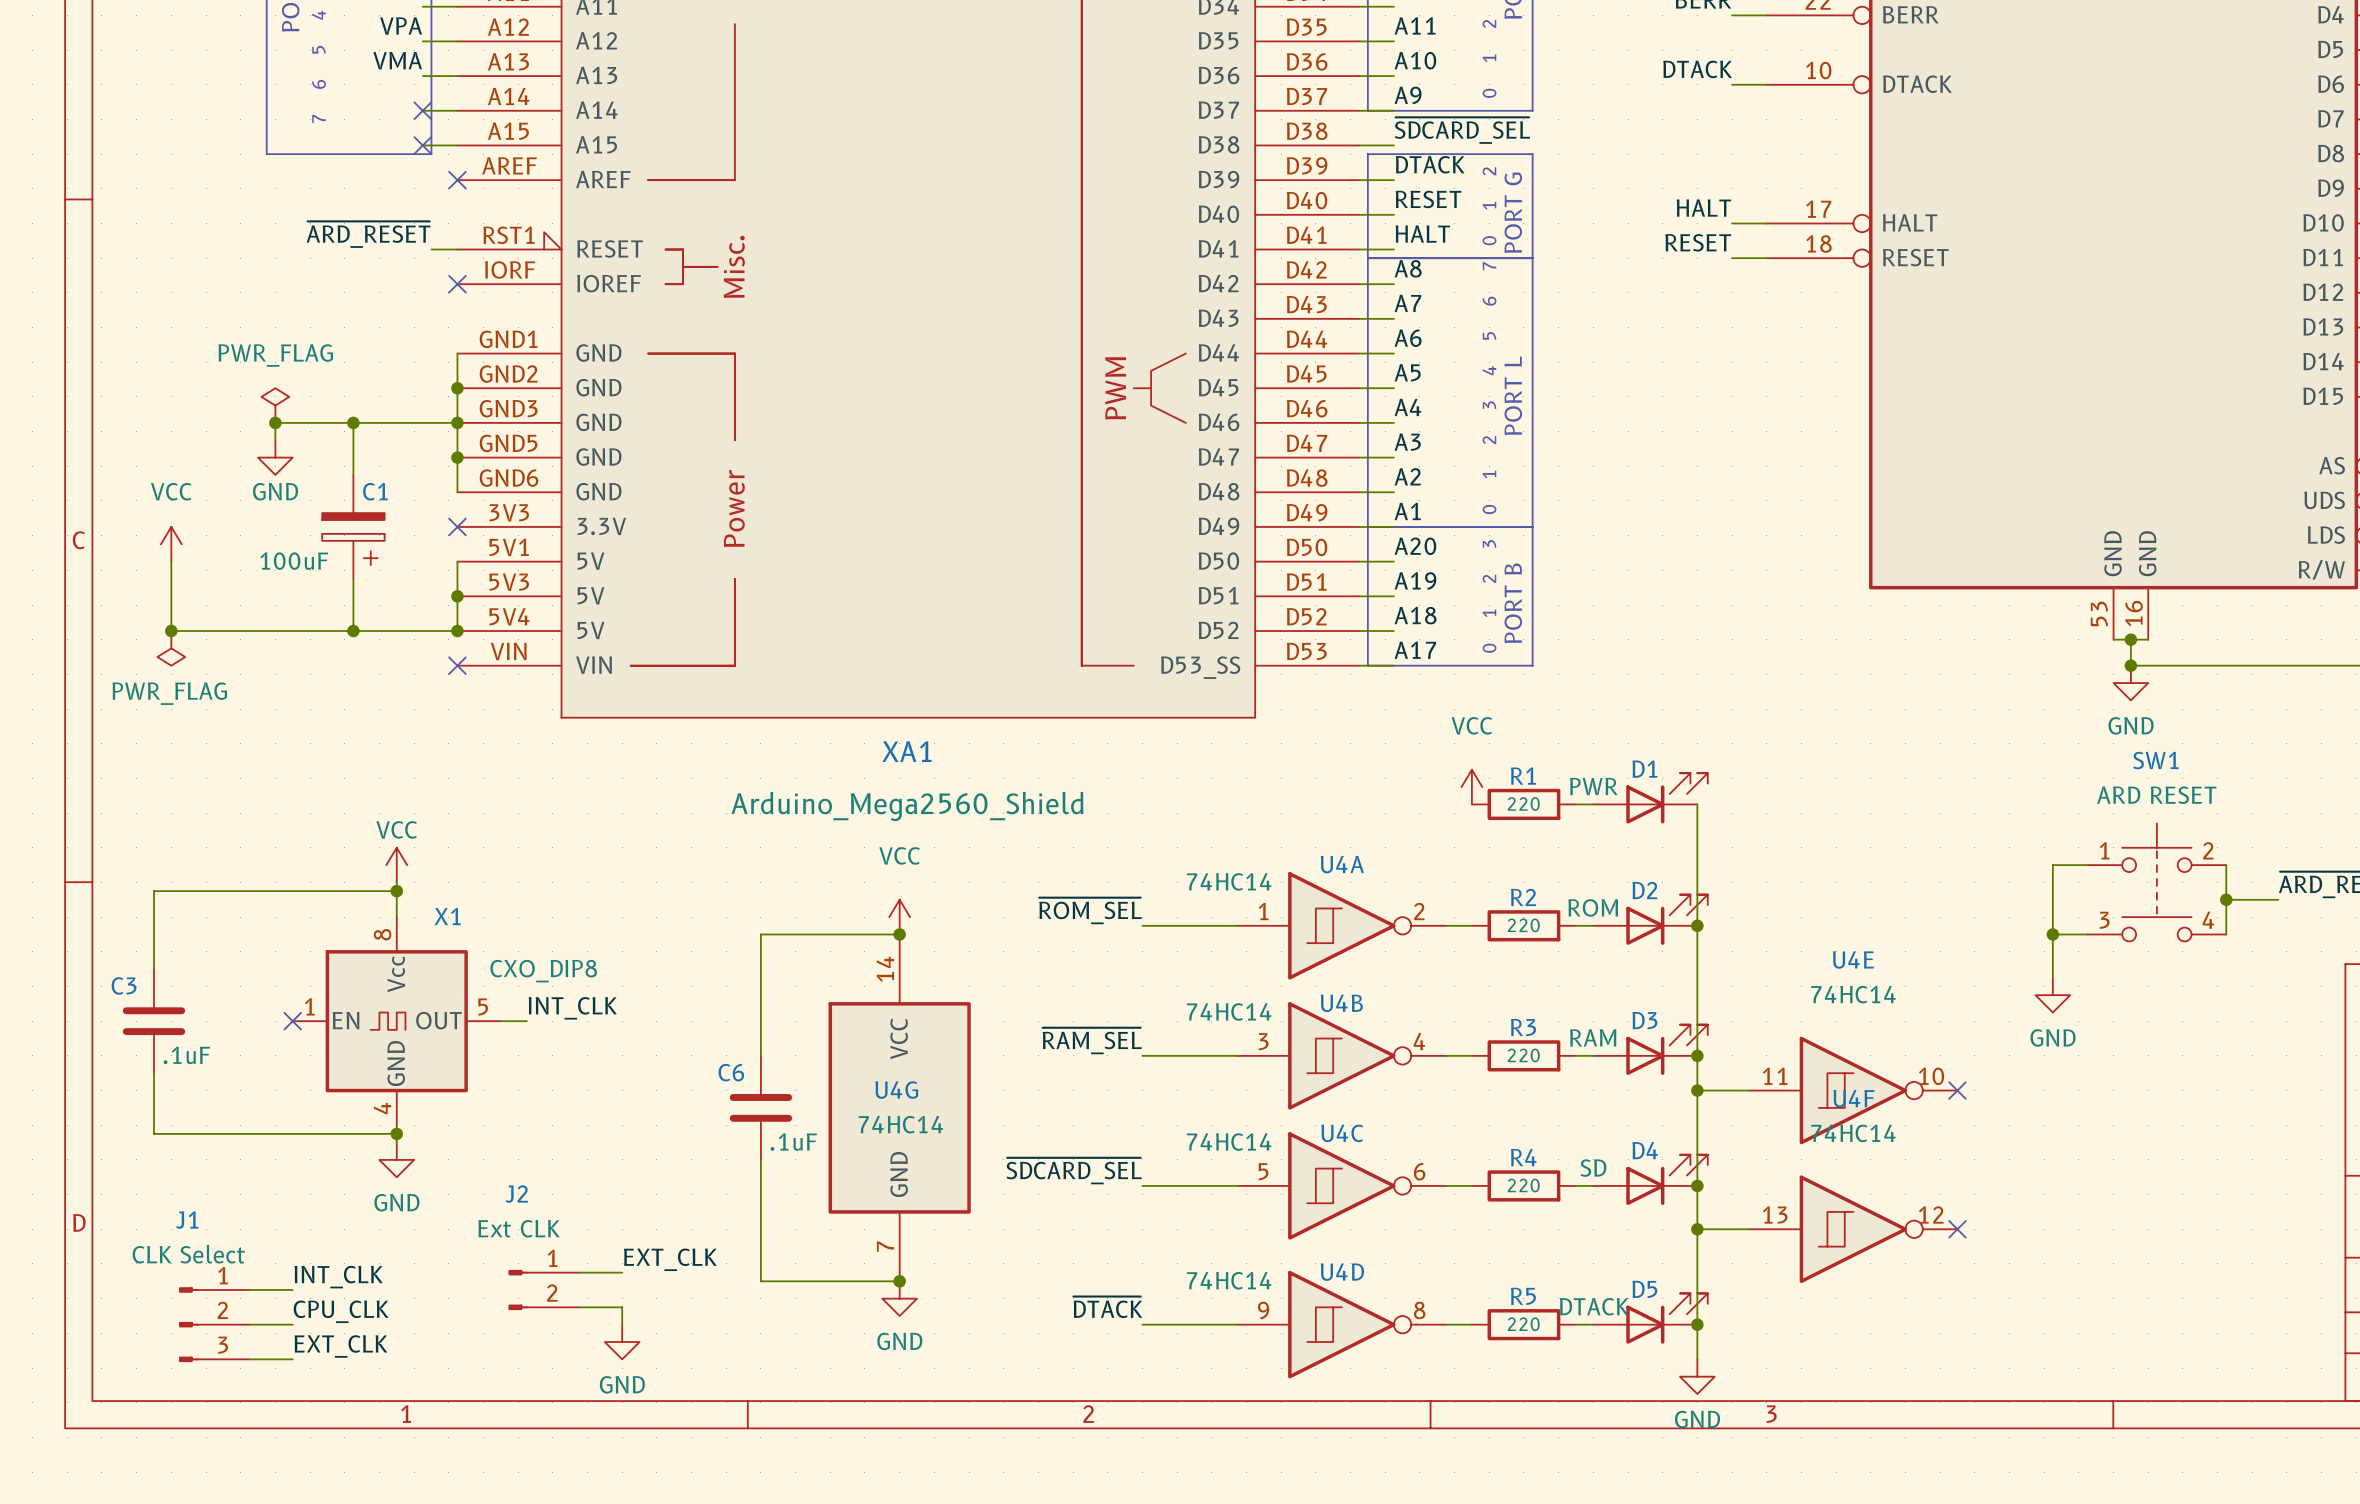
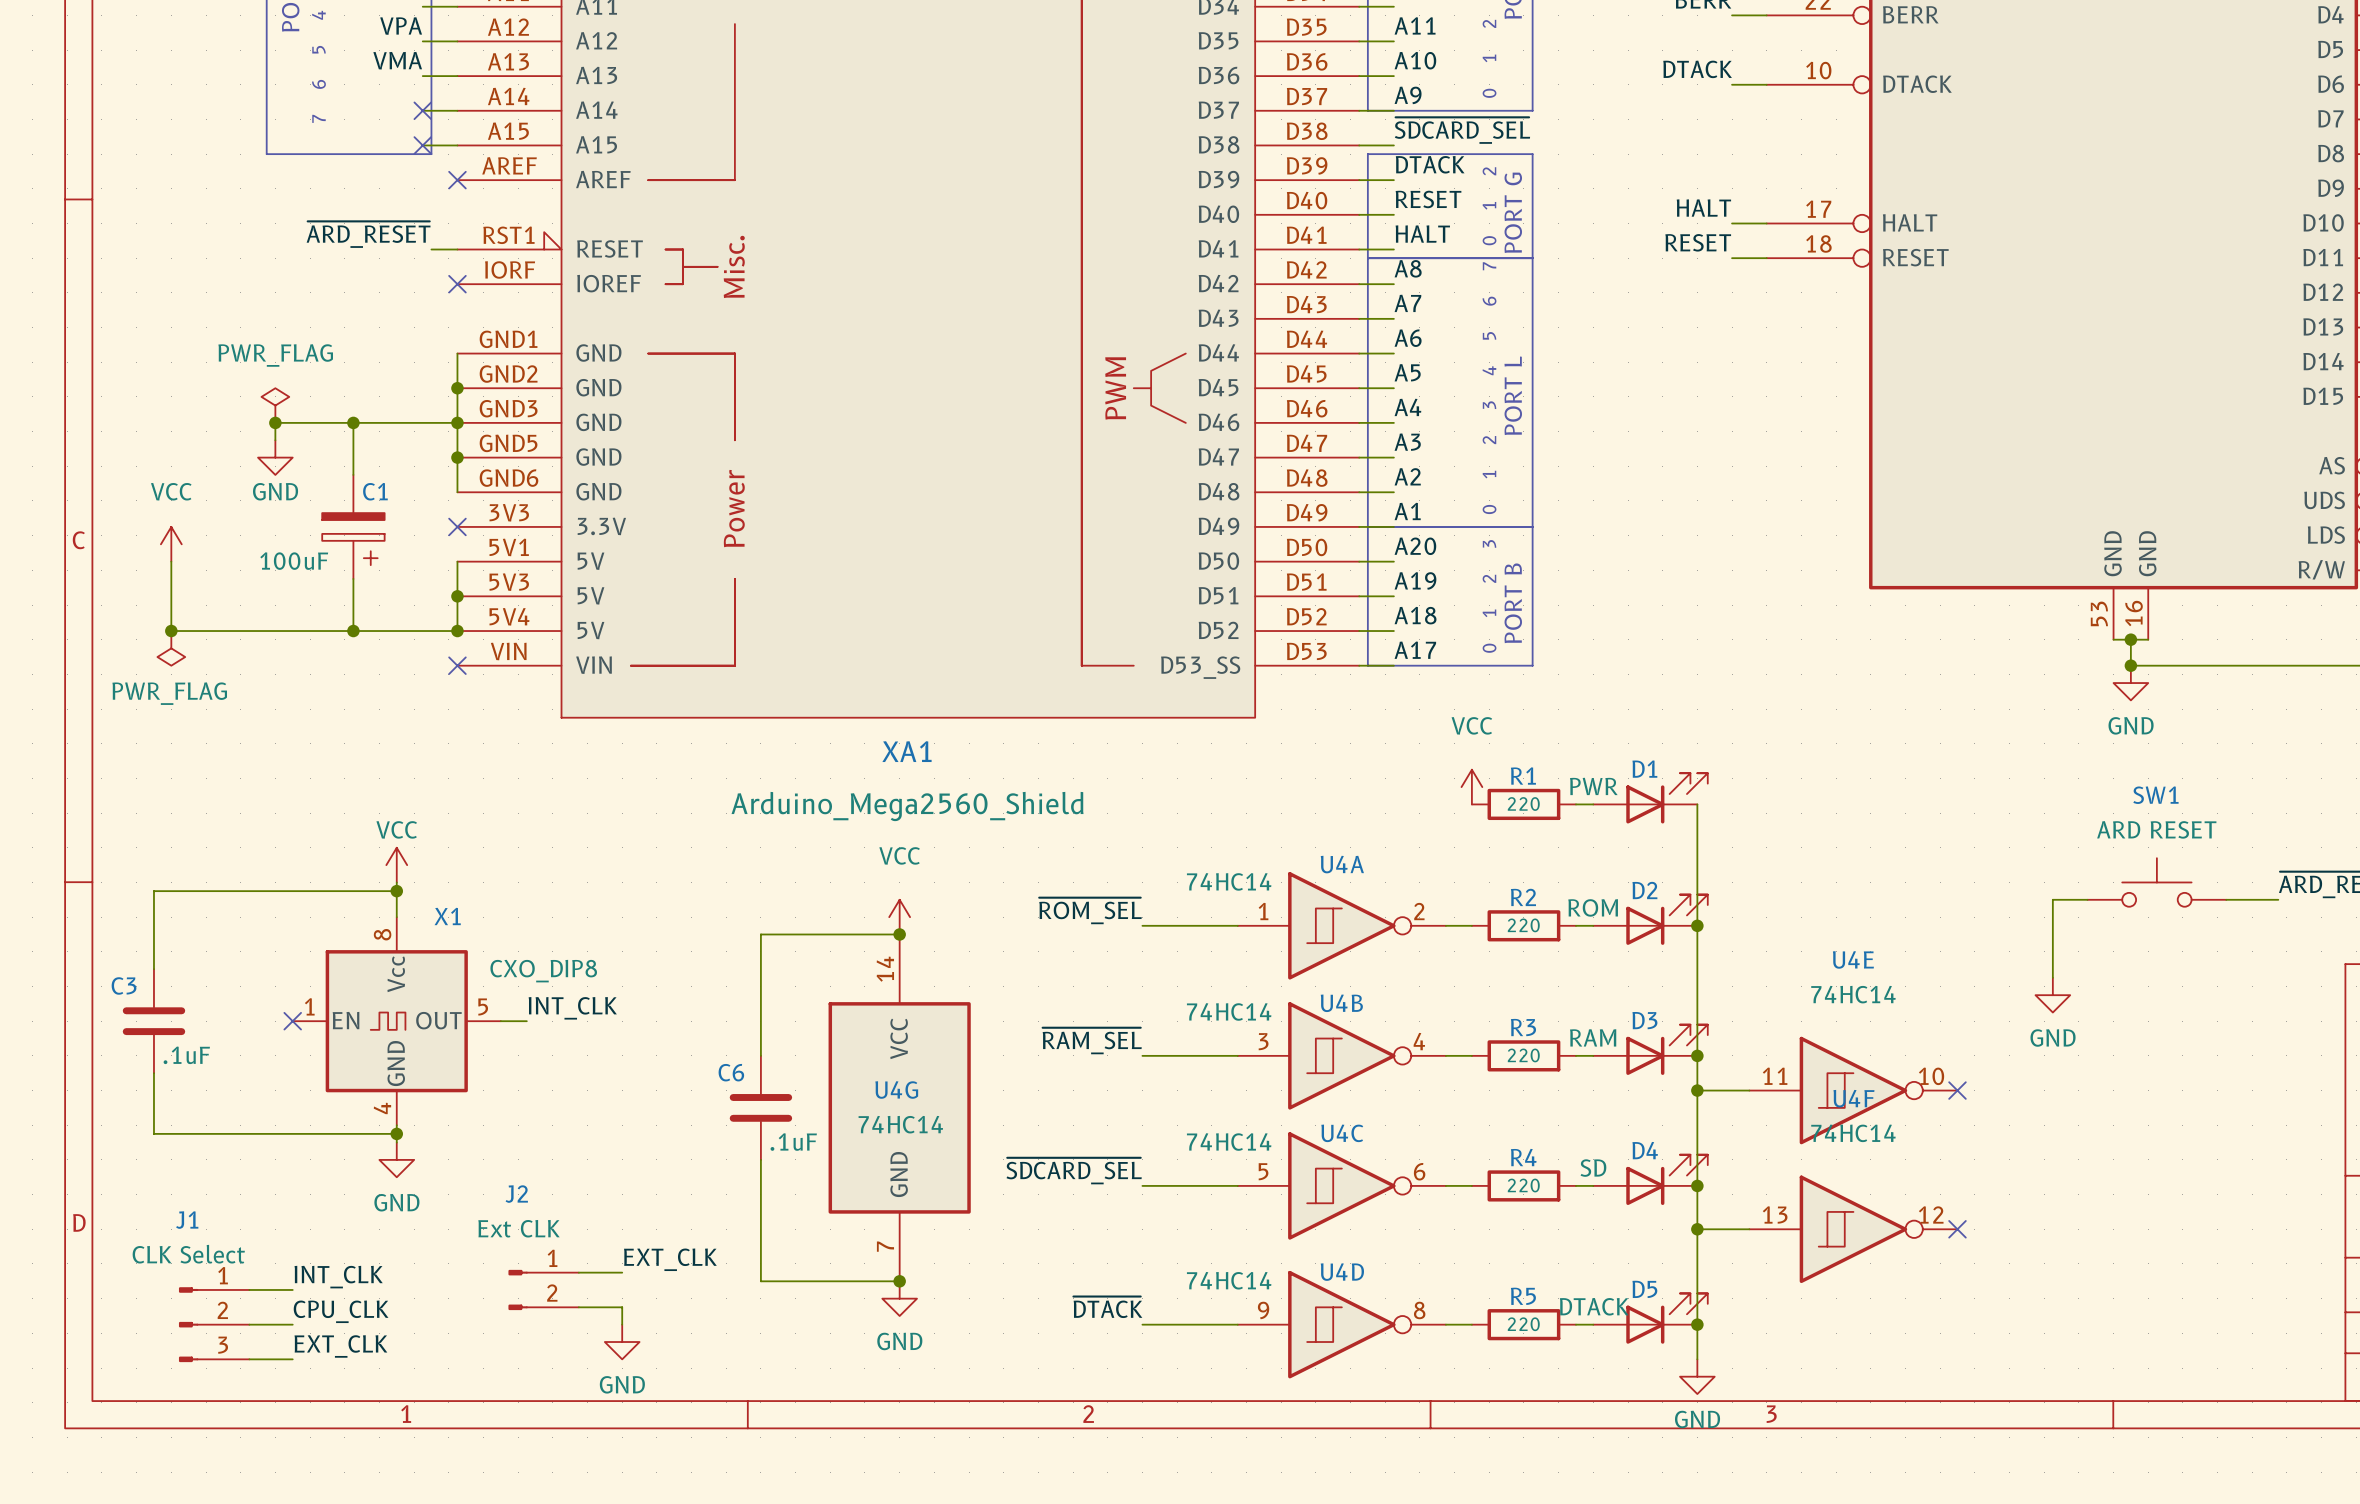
SW1 name position: SW1 (2155, 760) -> SW1 (2155, 795)
SW1 value position: ARD RESET (2156, 795) -> ARD RESET (2156, 829)
SW1 symbol: [2087, 823, 2227, 942] -> [2087, 858, 2227, 907]
wire: (2087, 865) (2052, 865) (2052, 899) -> (2087, 899) (2052, 899)
wire: (2226, 865) (2226, 934) -> none
junction: (2226, 899) -> none
wire: (2052, 934) (2087, 934) -> none
junction: (2052, 934) -> none

